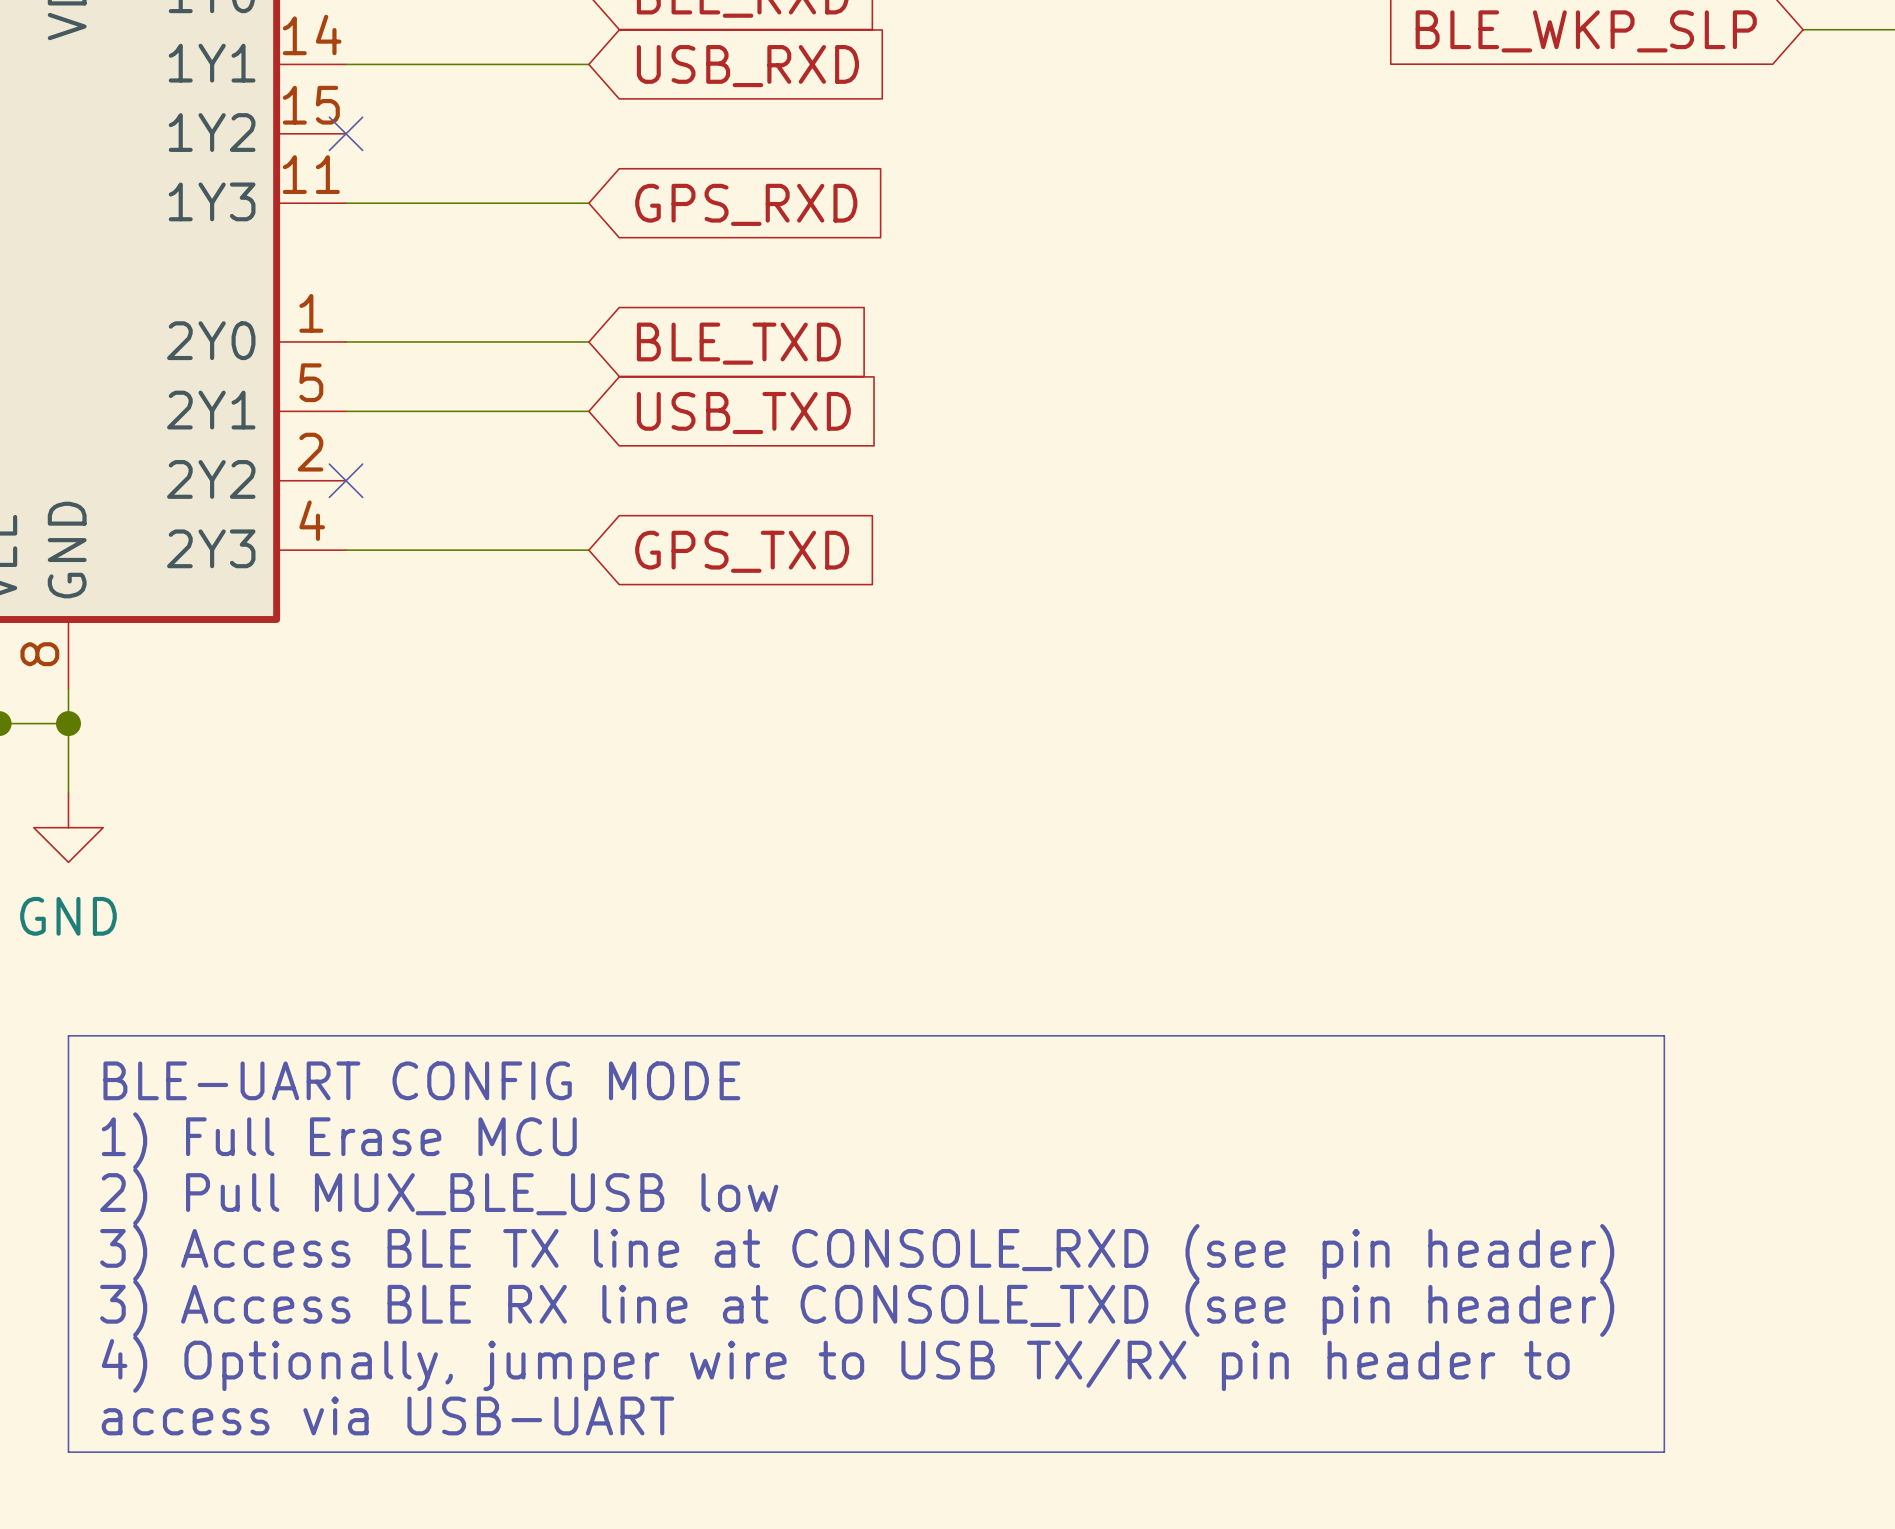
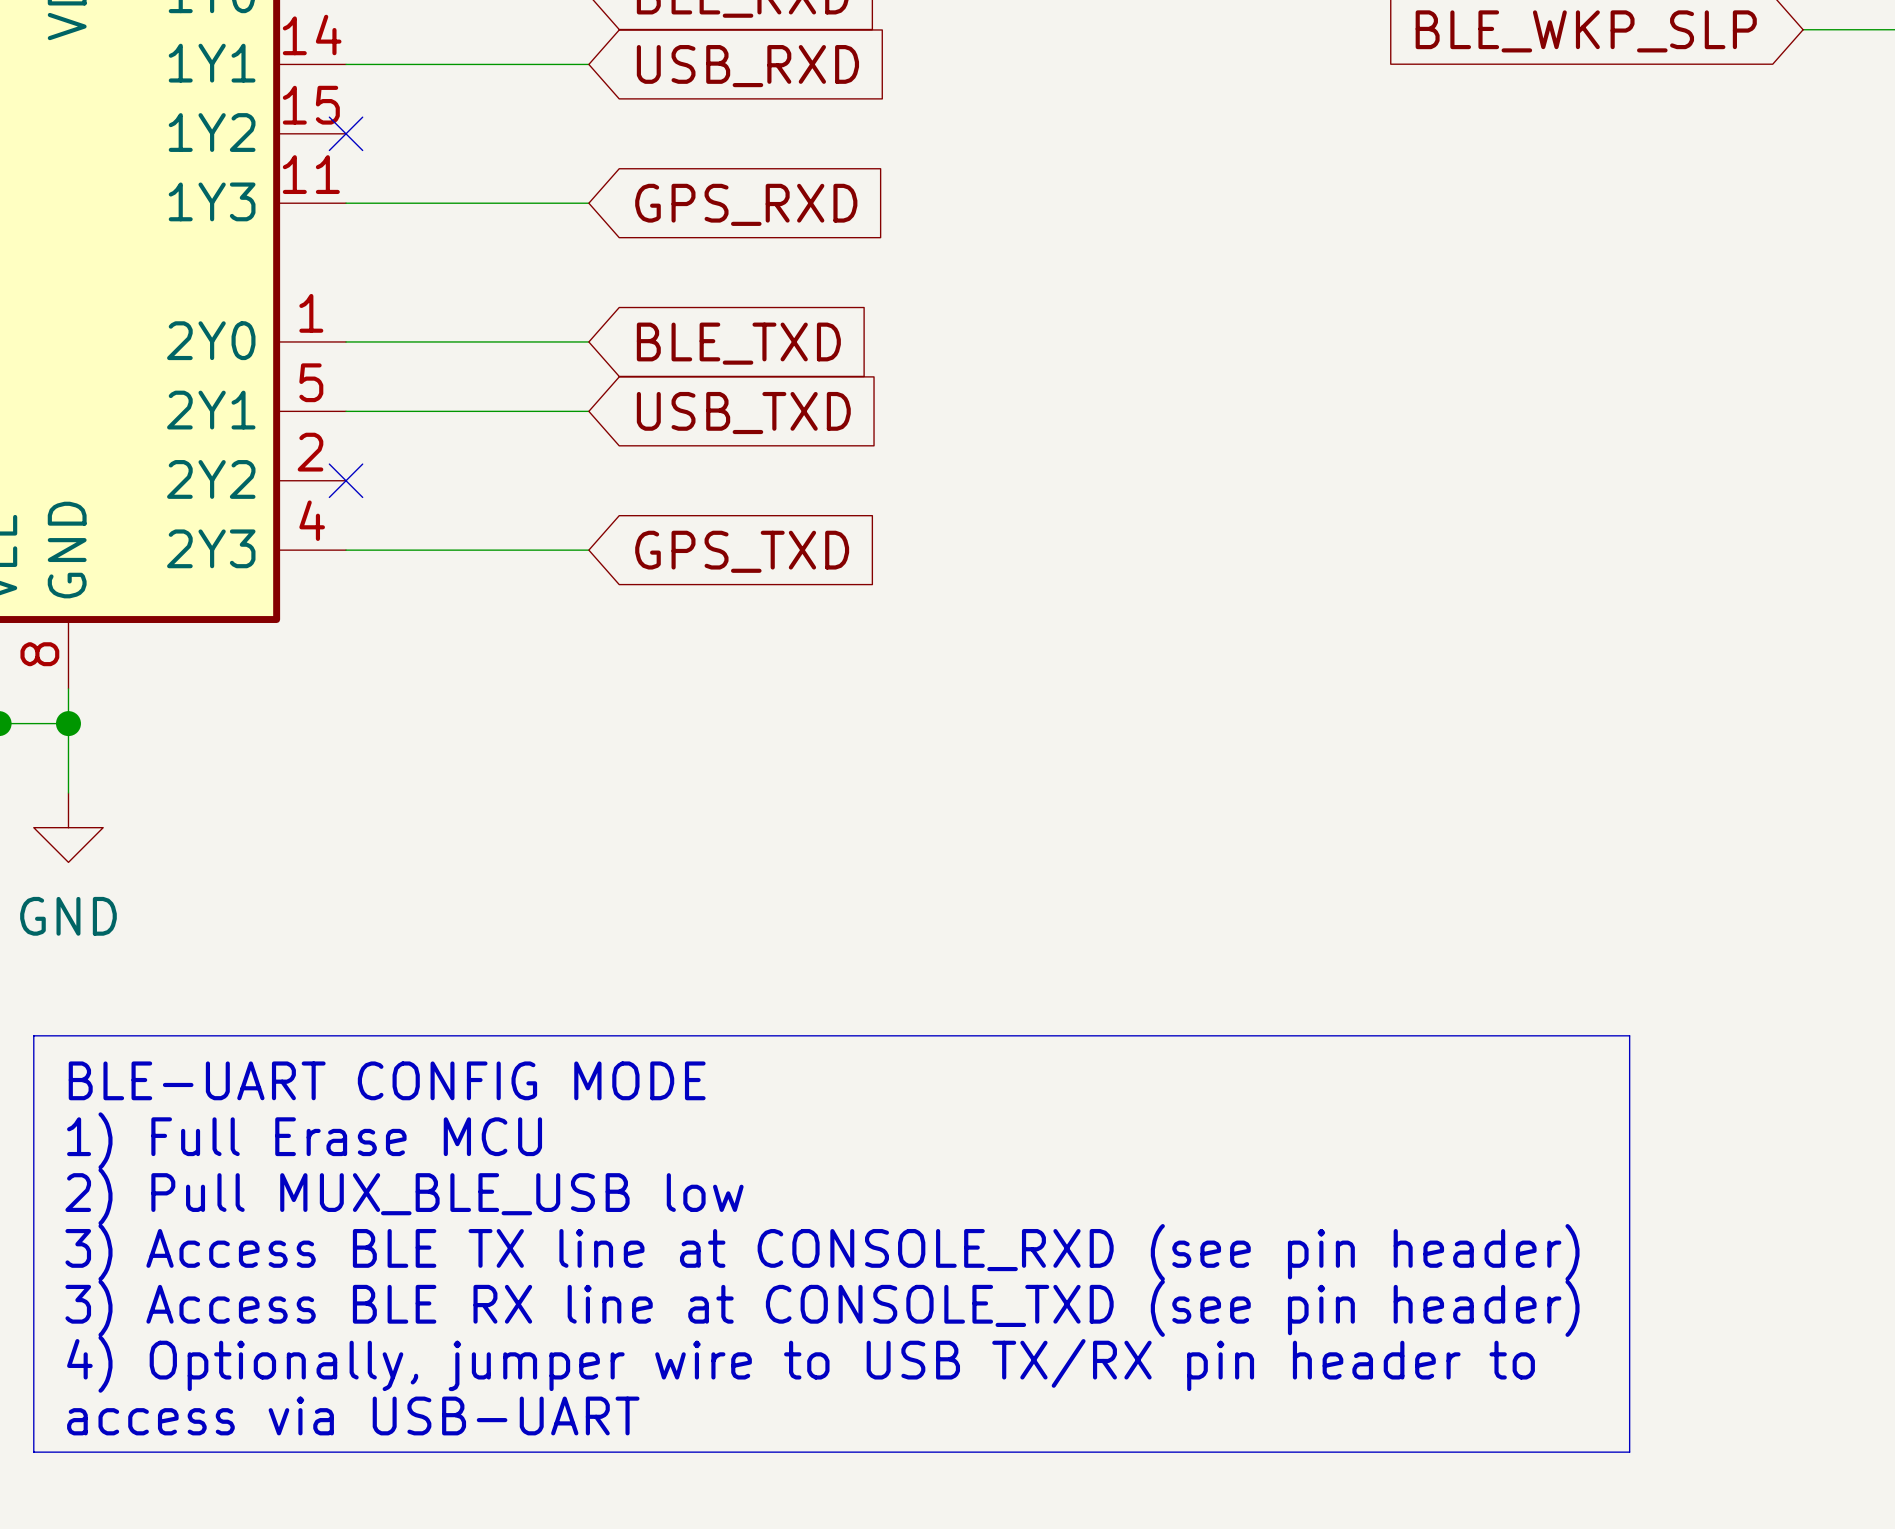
line: (68, 1035) (68, 1452) -> (68, 1035) (33, 1035) (33, 1452) (68, 1452)
line: (1629, 1035) (1664, 1035) (1664, 1452) (1629, 1452) -> (1629, 1035) (1629, 1452)
text position: BLE-UART CONFIG MODE (421, 1080) -> BLE-UART CONFIG MODE (387, 1080)
text position: 1) Full Erase MCU (339, 1140) -> 1) Full Erase MCU (304, 1140)
text position: 2) Pull MUX_BLE_USB low (439, 1196) -> 2) Pull MUX_BLE_USB low (404, 1196)
text position: 3) Access BLE TX line at CONSOLE_RXD (see pin header) (857, 1252) -> 3) Access BLE TX line at CONSOLE_RXD (see pin header) (822, 1252)
text position: 3) Access BLE RX line at CONSOLE_TXD (see pin header) (857, 1308) -> 3) Access BLE RX line at CONSOLE_TXD (see pin header) (822, 1308)
text position: 4) Optionally, jumper wire to USB TX/RX pin header to (835, 1364) -> 4) Optionally, jumper wire to USB TX/RX pin header to (801, 1364)
text position: access via USB-UART (387, 1415) -> access via USB-UART (353, 1415)

